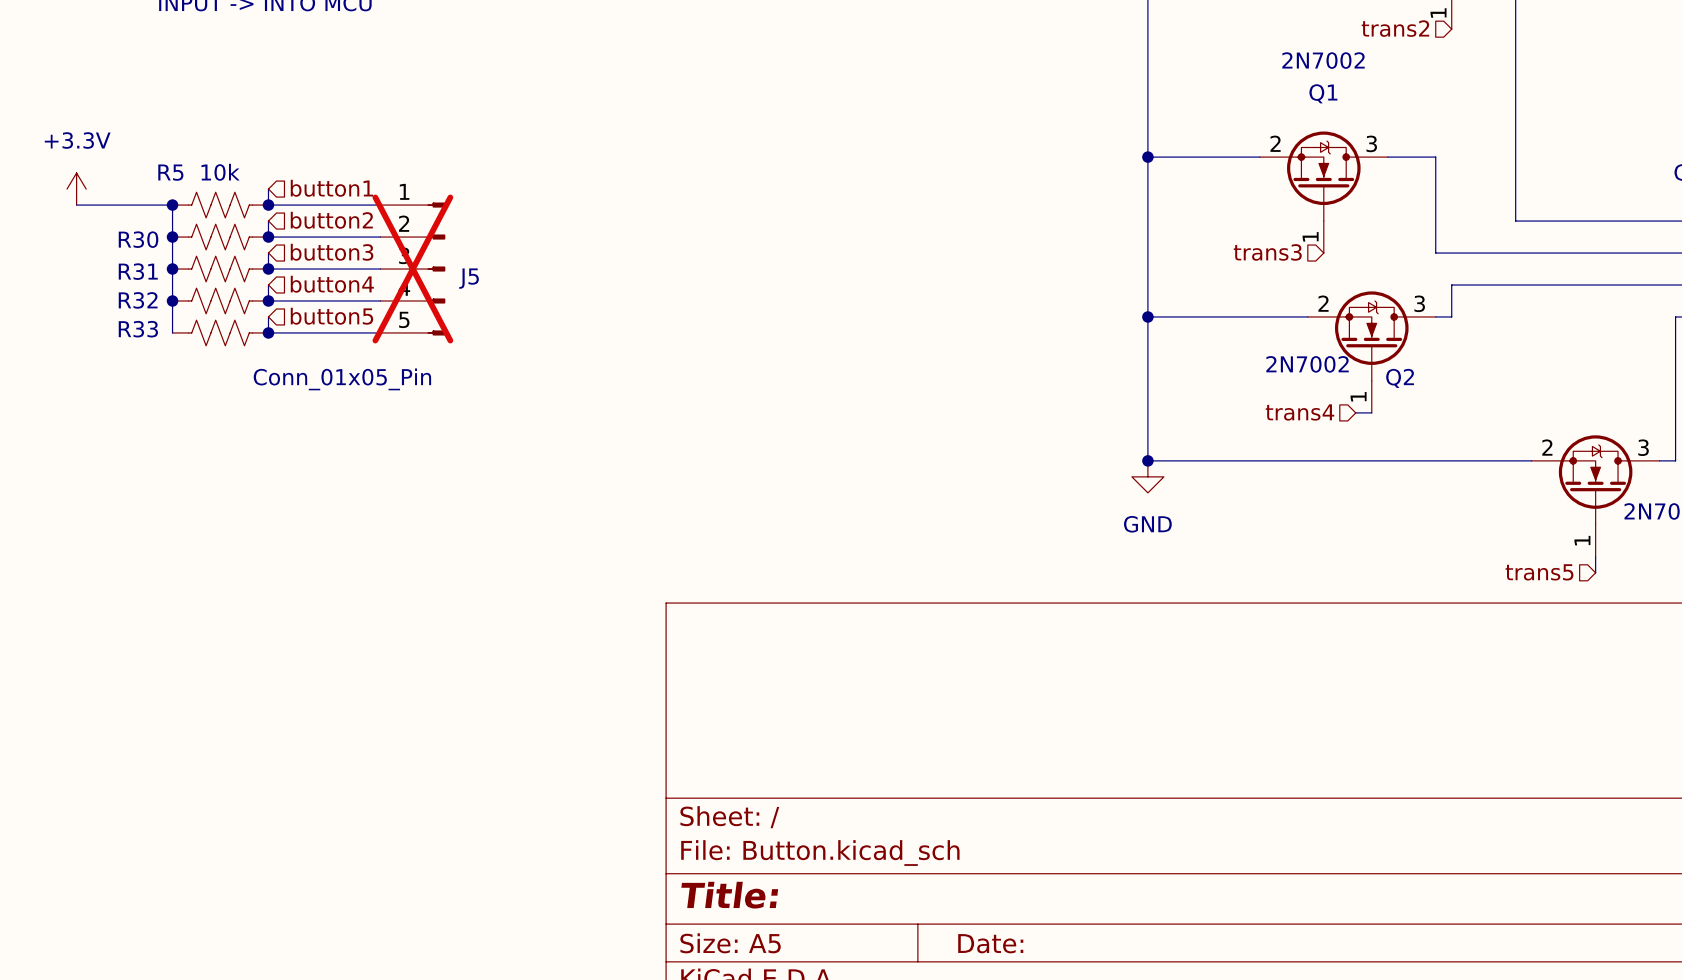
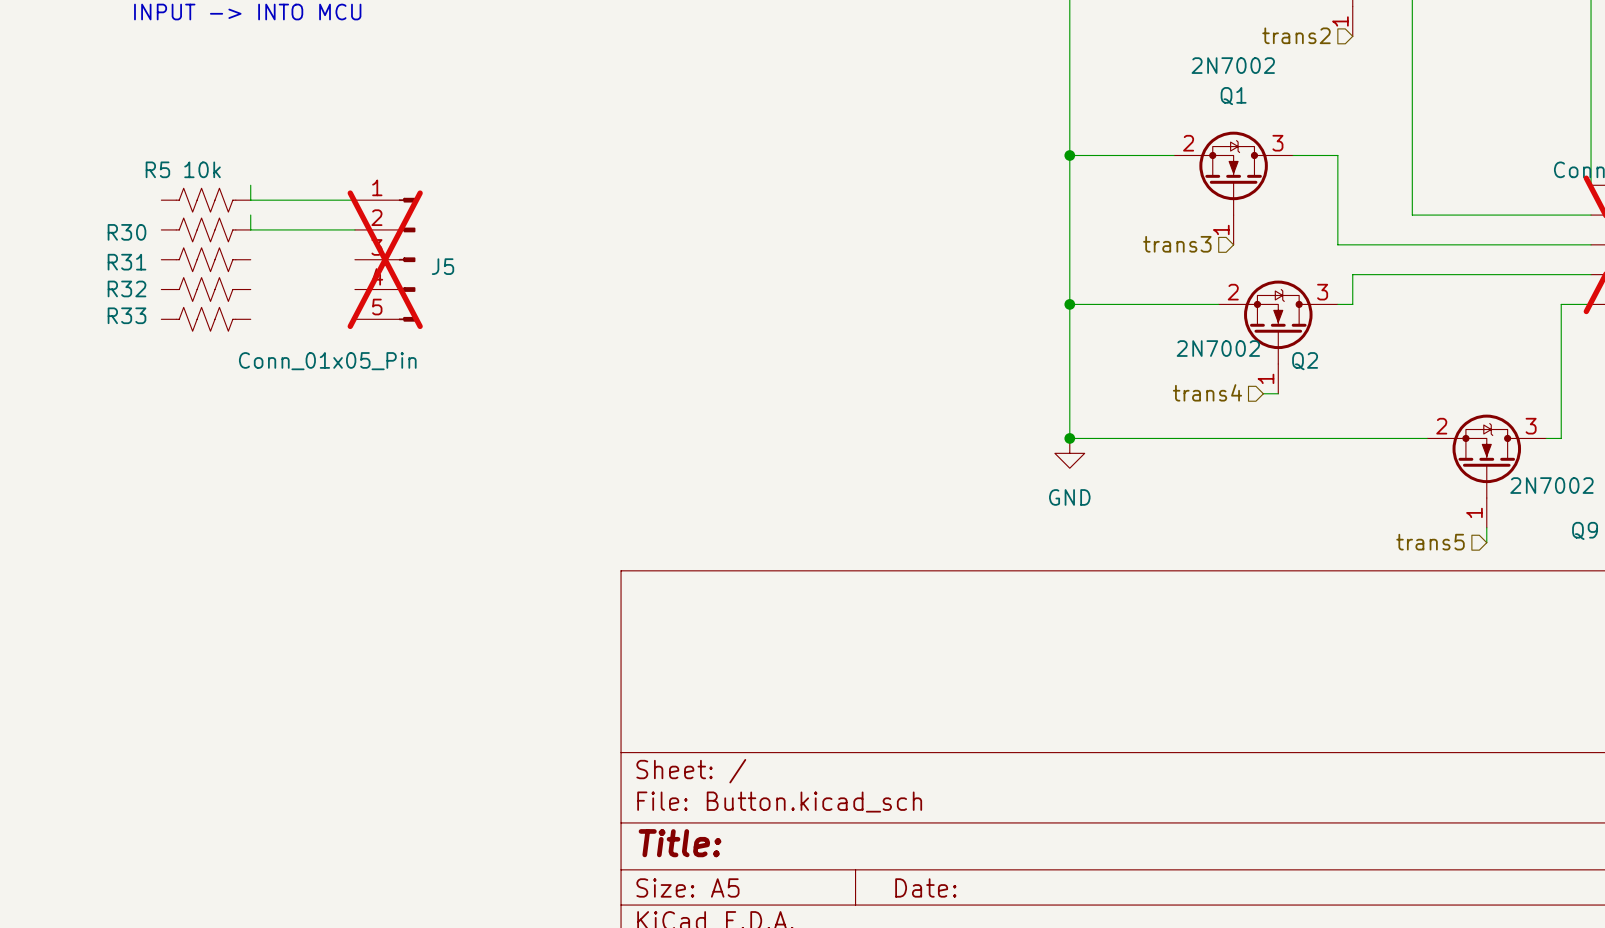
hierarchical label: button1 (331, 188) -> none
power symbol: +3.3V (76, 189) -> none
wire: (76, 205) (172, 205) (172, 332) -> none
junction: (172, 205) -> none
junction: (268, 205) -> none
hierarchical label: button2 (331, 220) -> none
junction: (172, 237) -> none
junction: (268, 237) -> none
hierarchical label: button3 (332, 252) -> none
wire: (268, 253) (268, 269) (380, 269) -> none
junction: (172, 269) -> none
junction: (268, 269) -> none
hierarchical label: button4 (332, 284) -> none
wire: (268, 285) (268, 300) (380, 300) -> none
junction: (172, 300) -> none
junction: (268, 300) -> none
wire: (268, 316) (268, 332) (380, 332) -> none
hierarchical label: button5 (331, 316) -> none
junction: (268, 332) -> none

